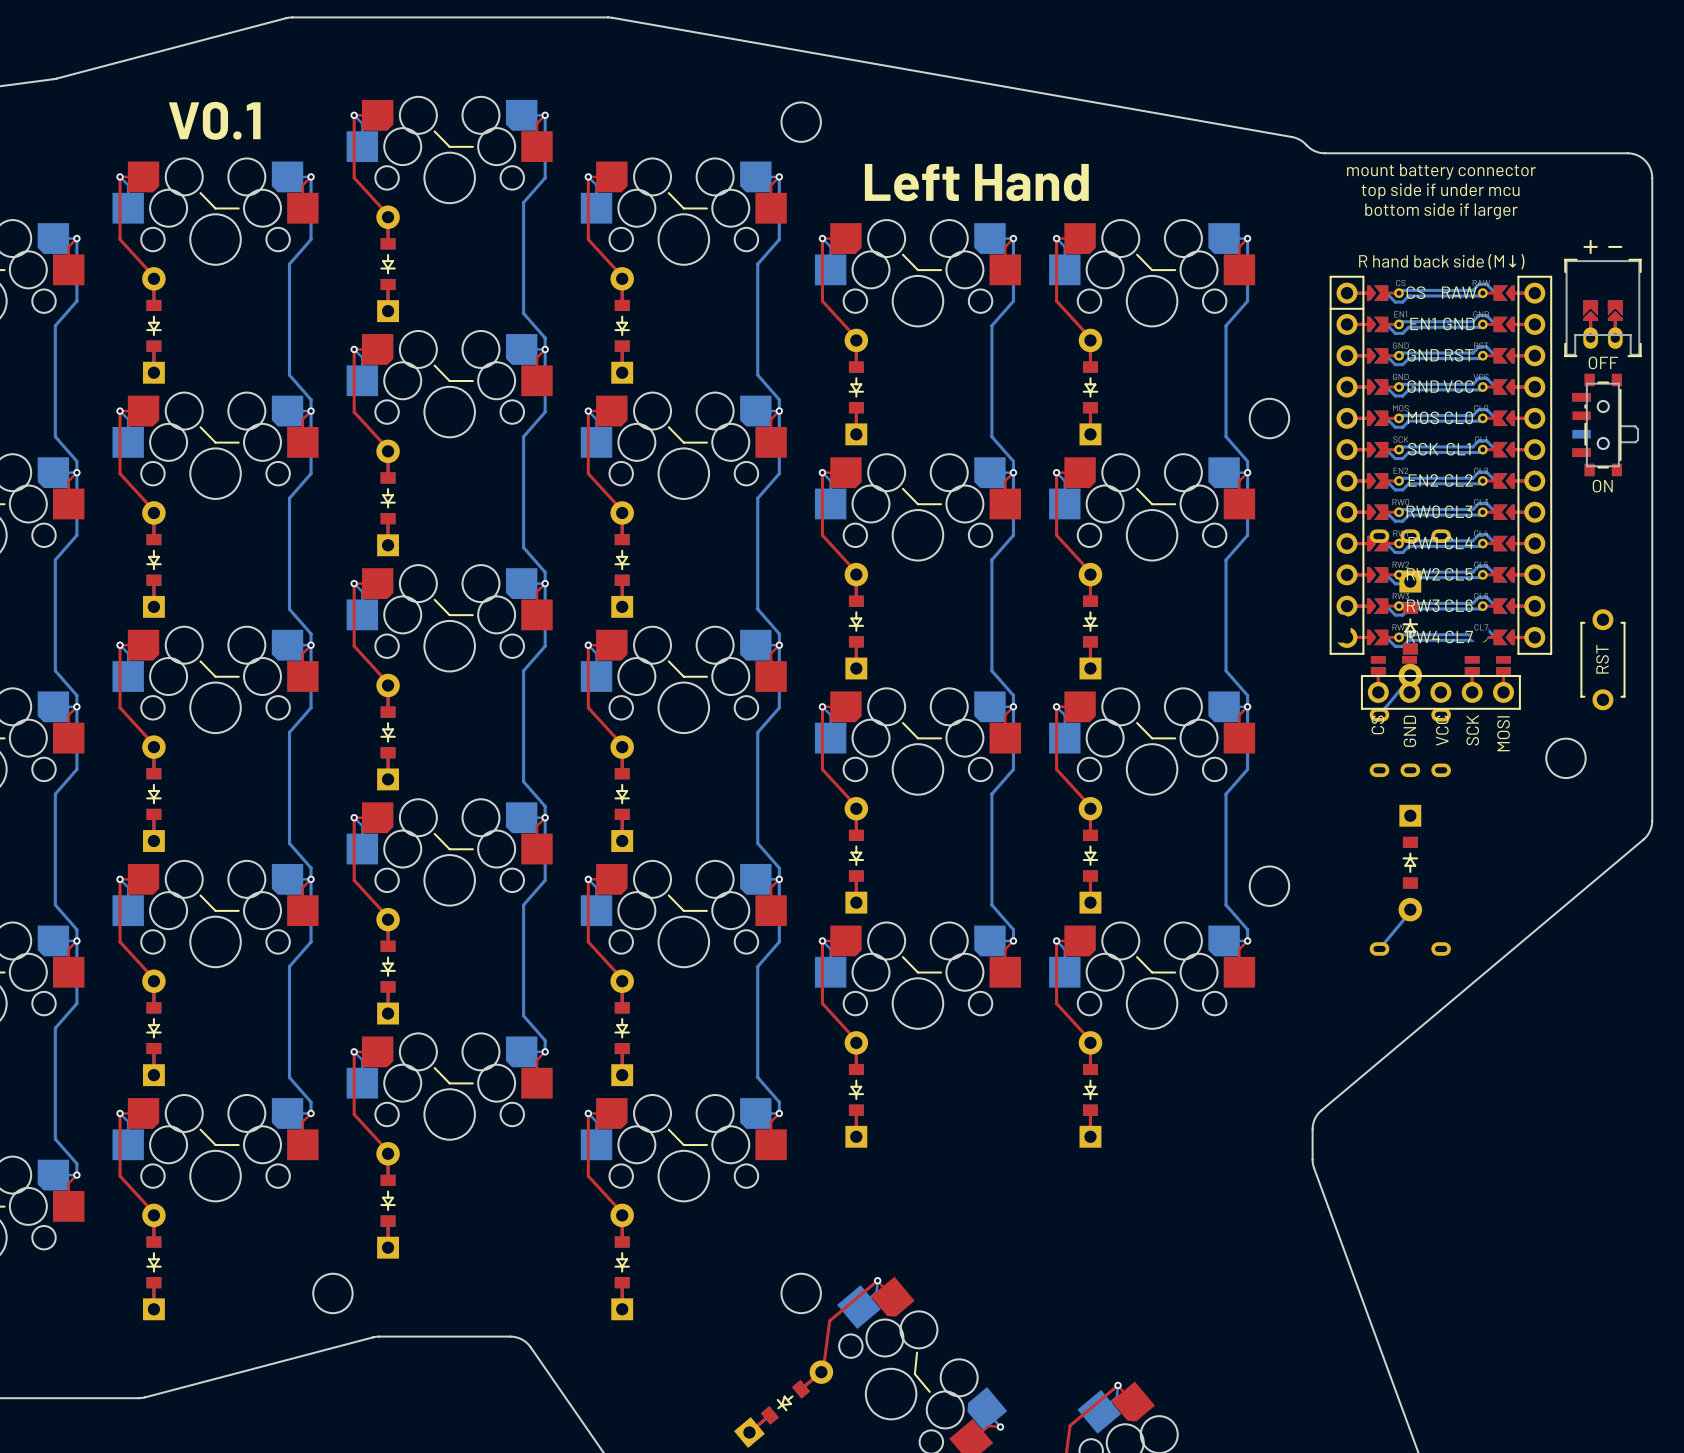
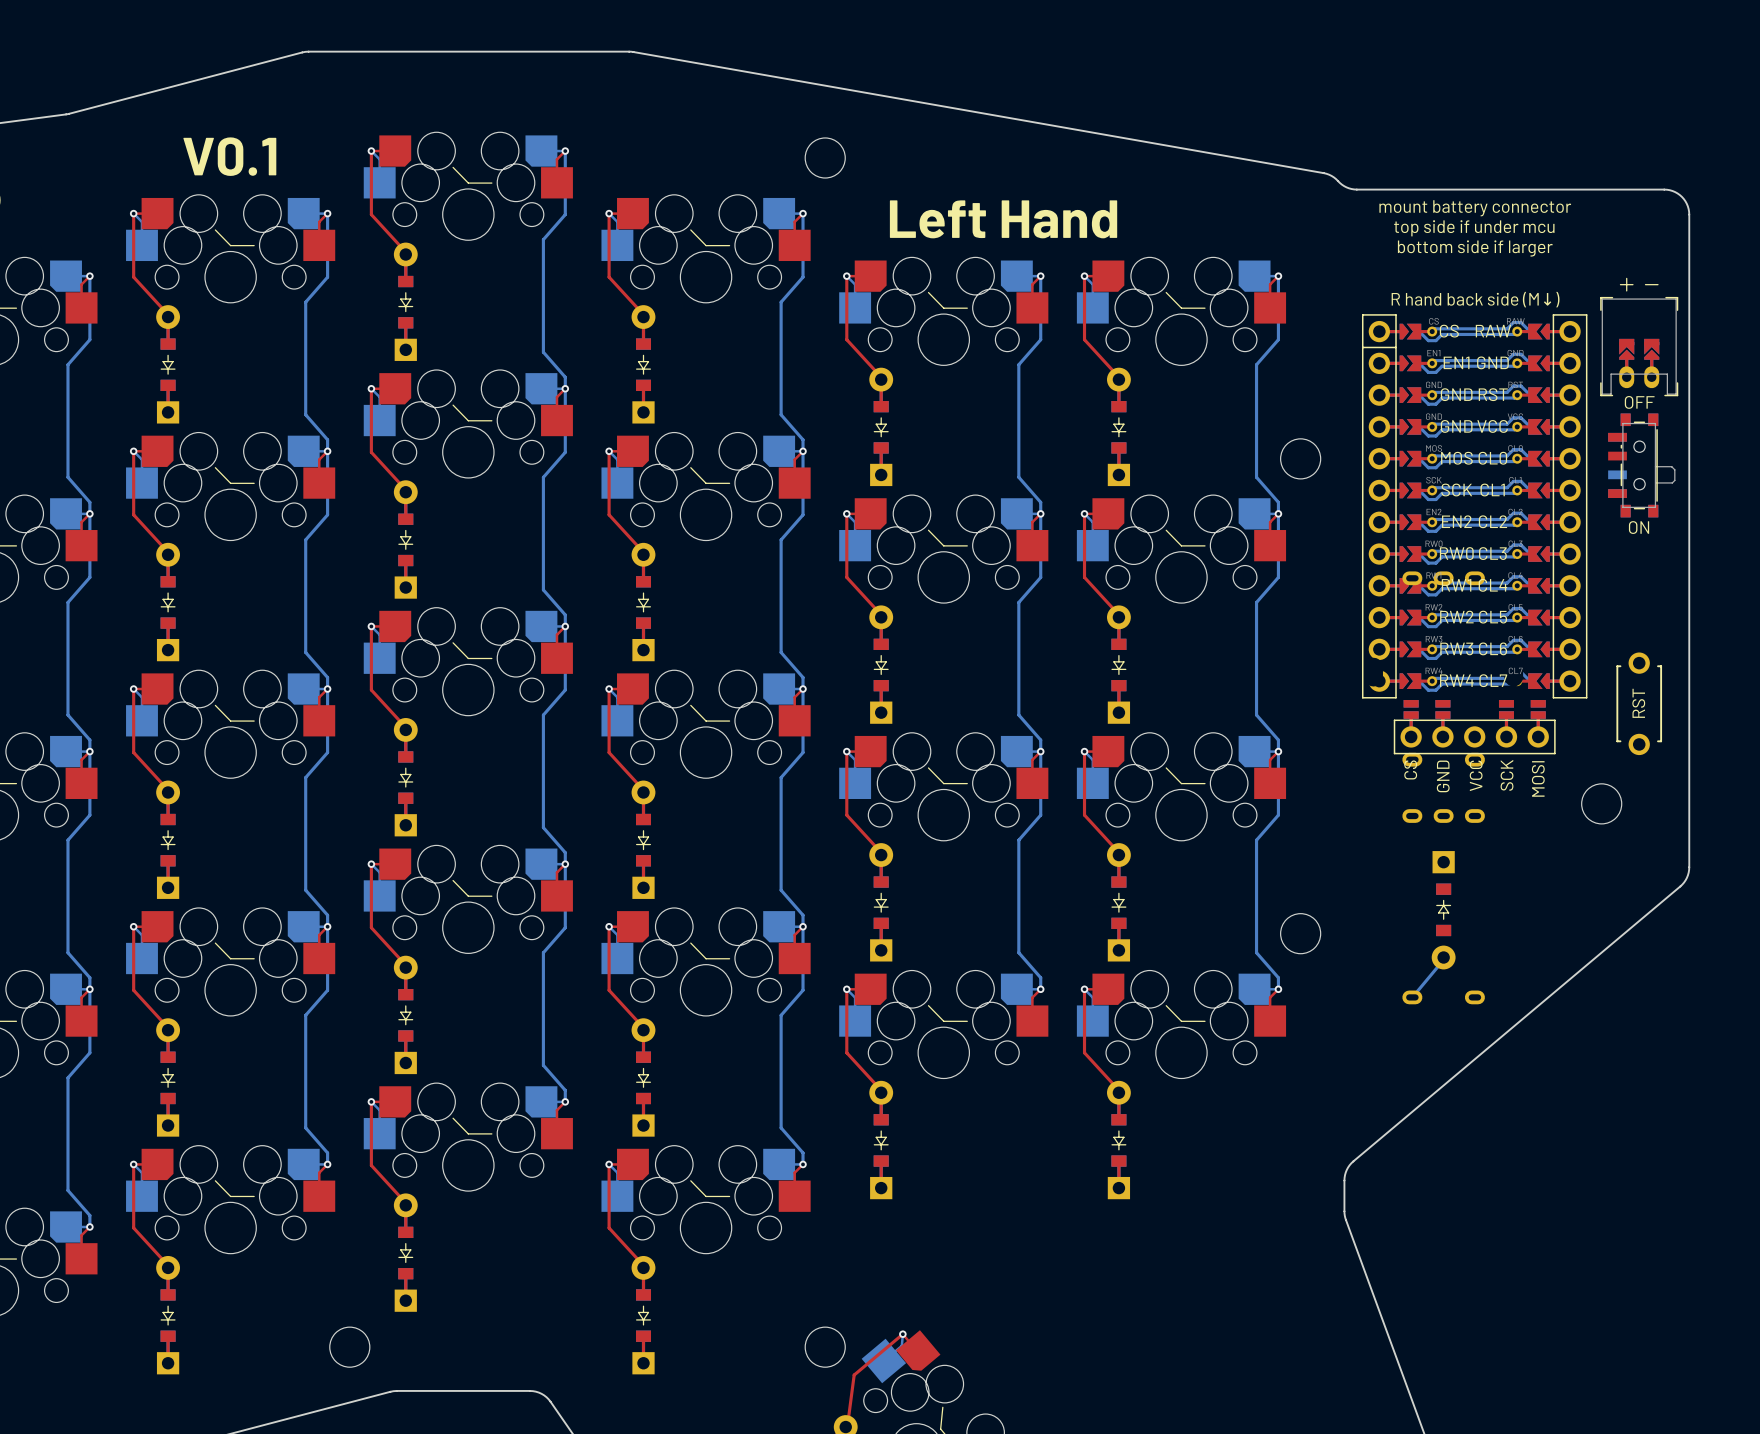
part: (1410, 628) -> none
bottom track: (1410, 677) (1379, 714) -> none

